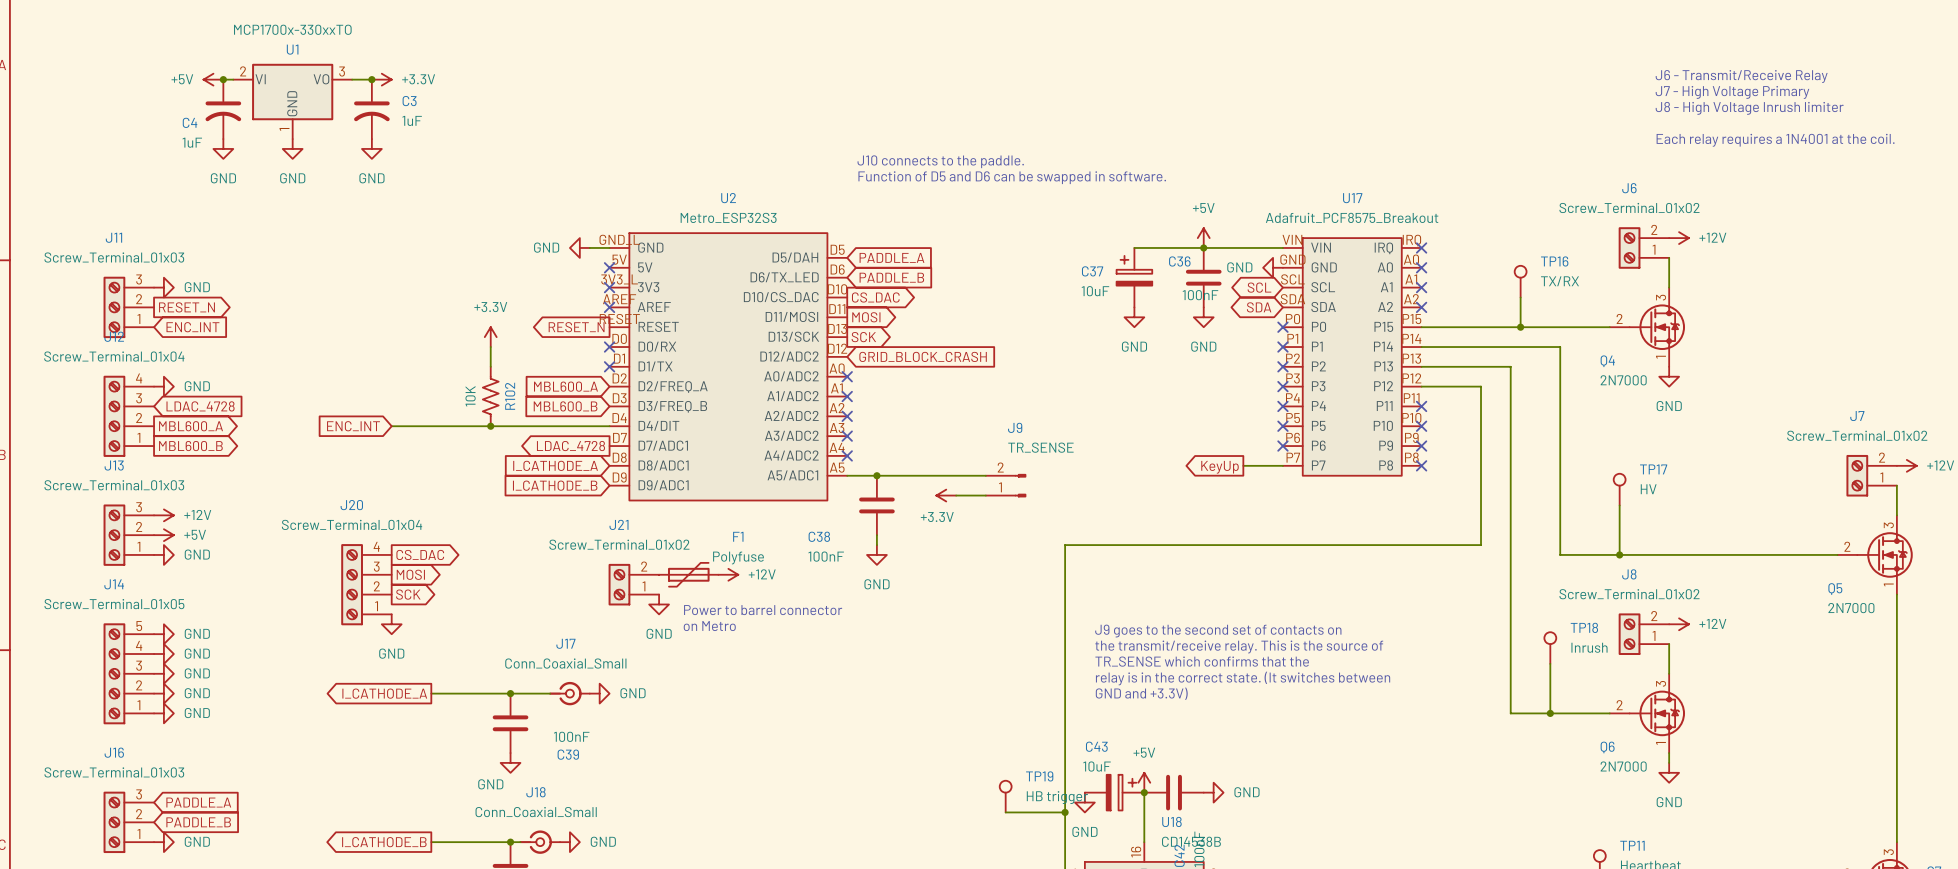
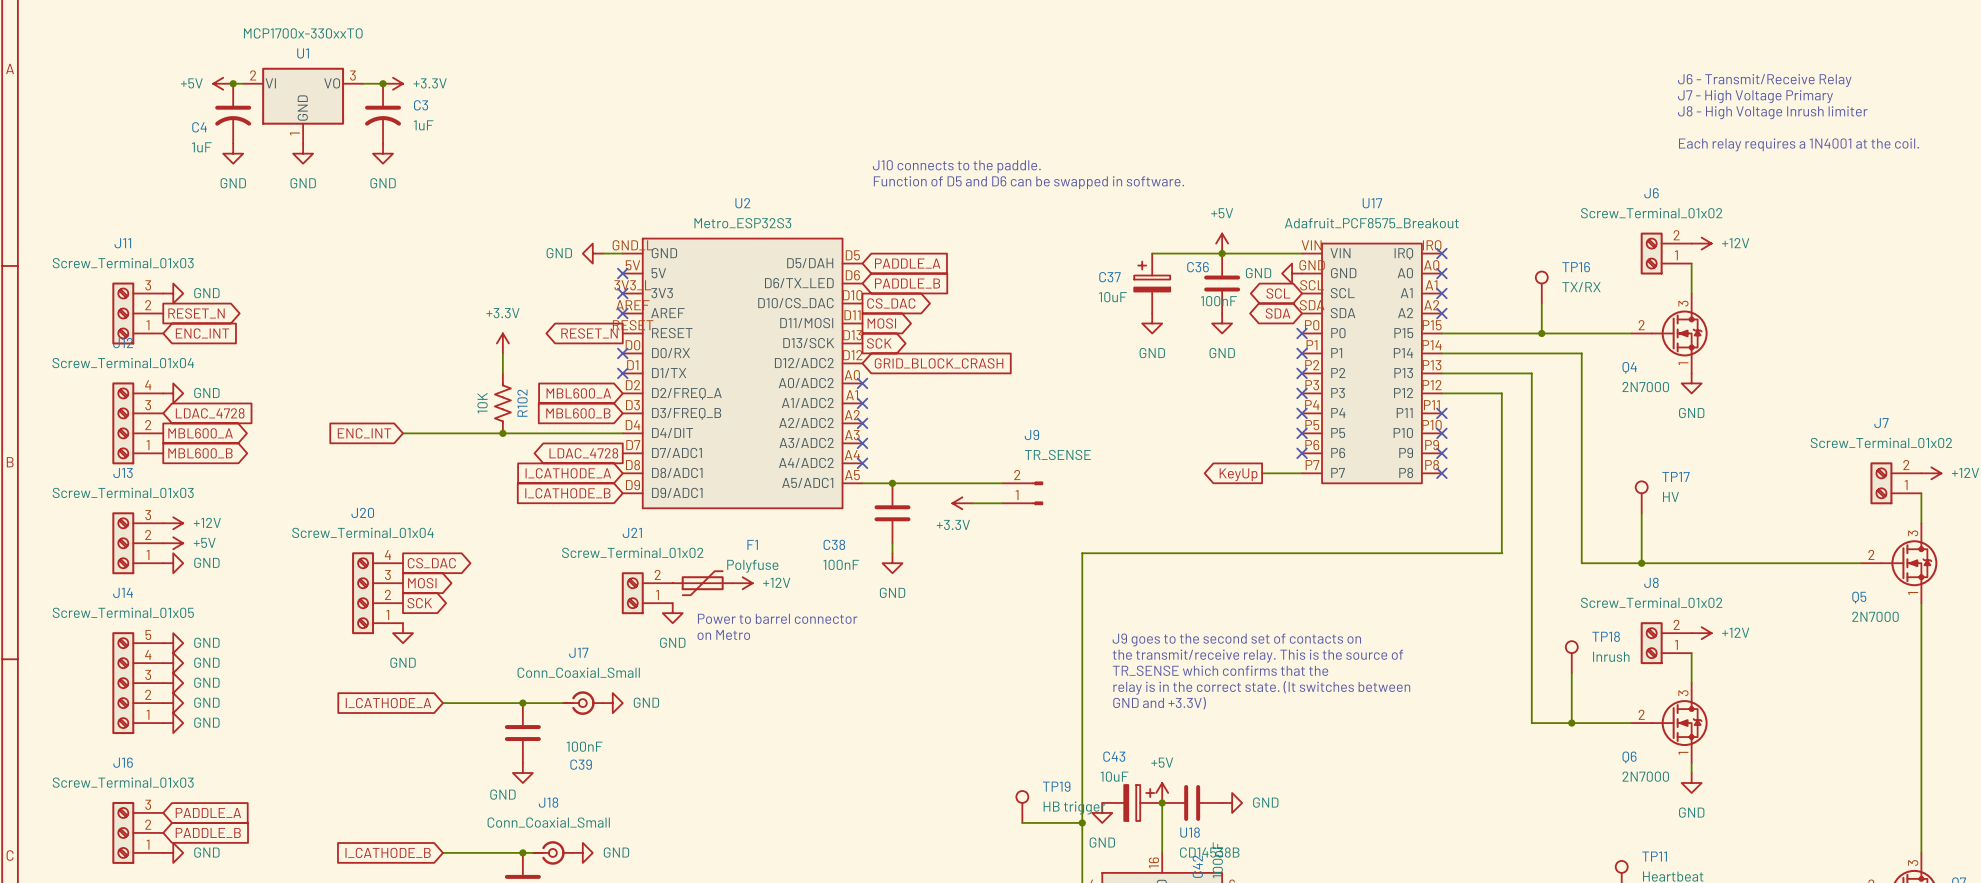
global label shape: output (384, 693) -> input (388, 703)
global label shape: output (384, 842) -> input (388, 852)

